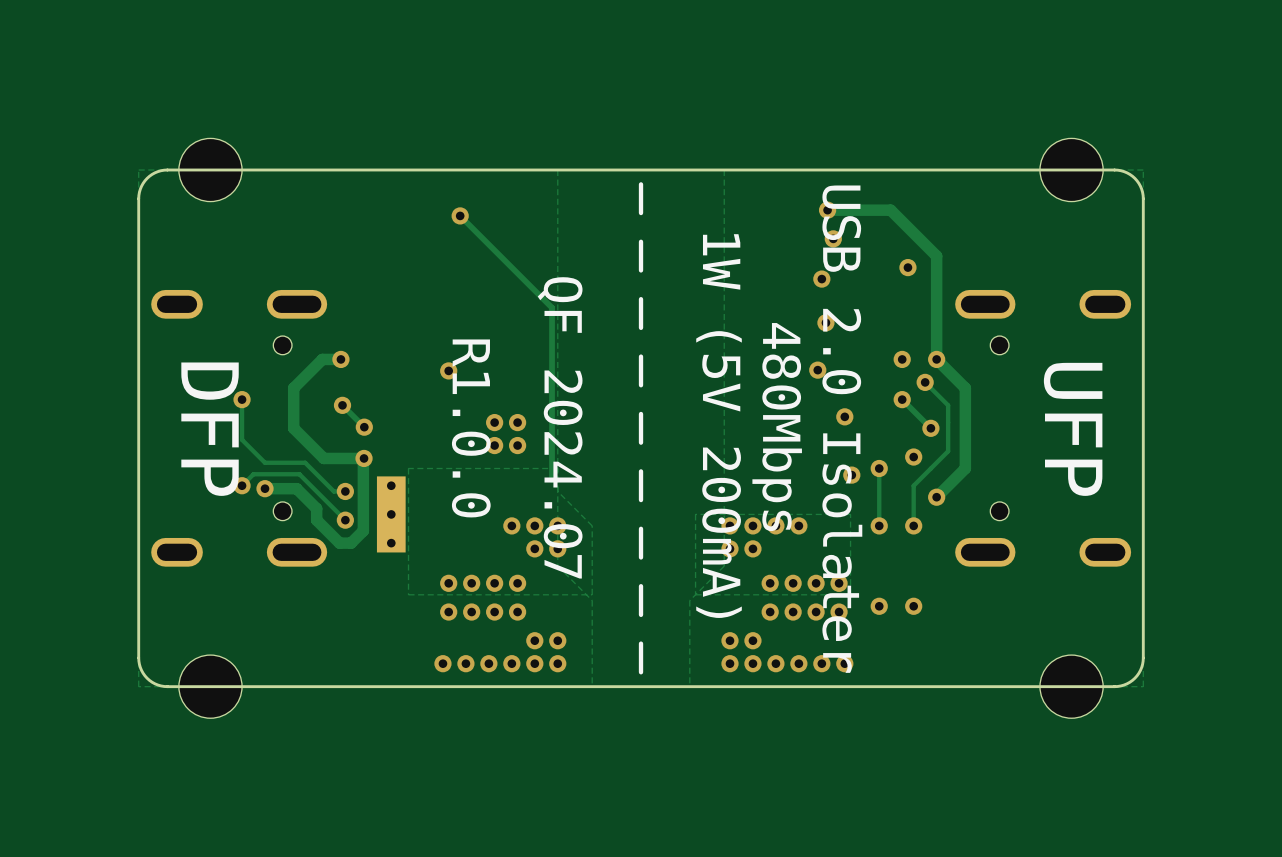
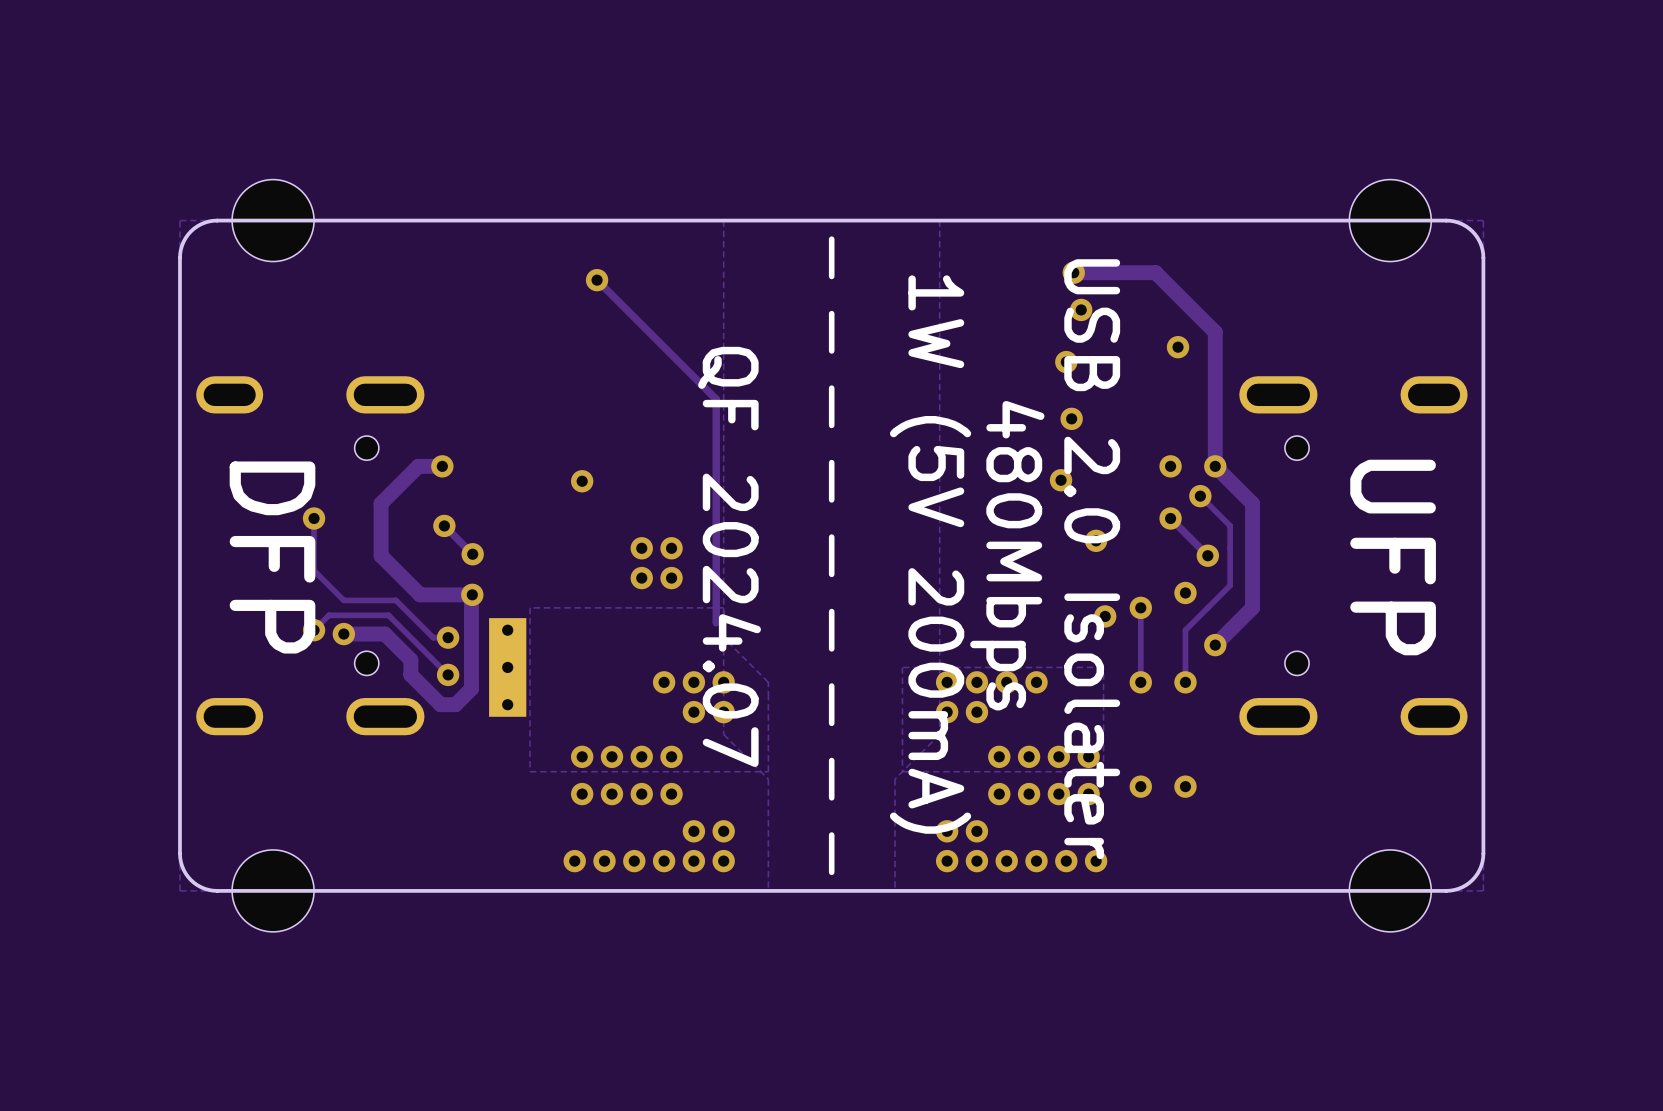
text: R1.0.0 (471, 428) -> none

